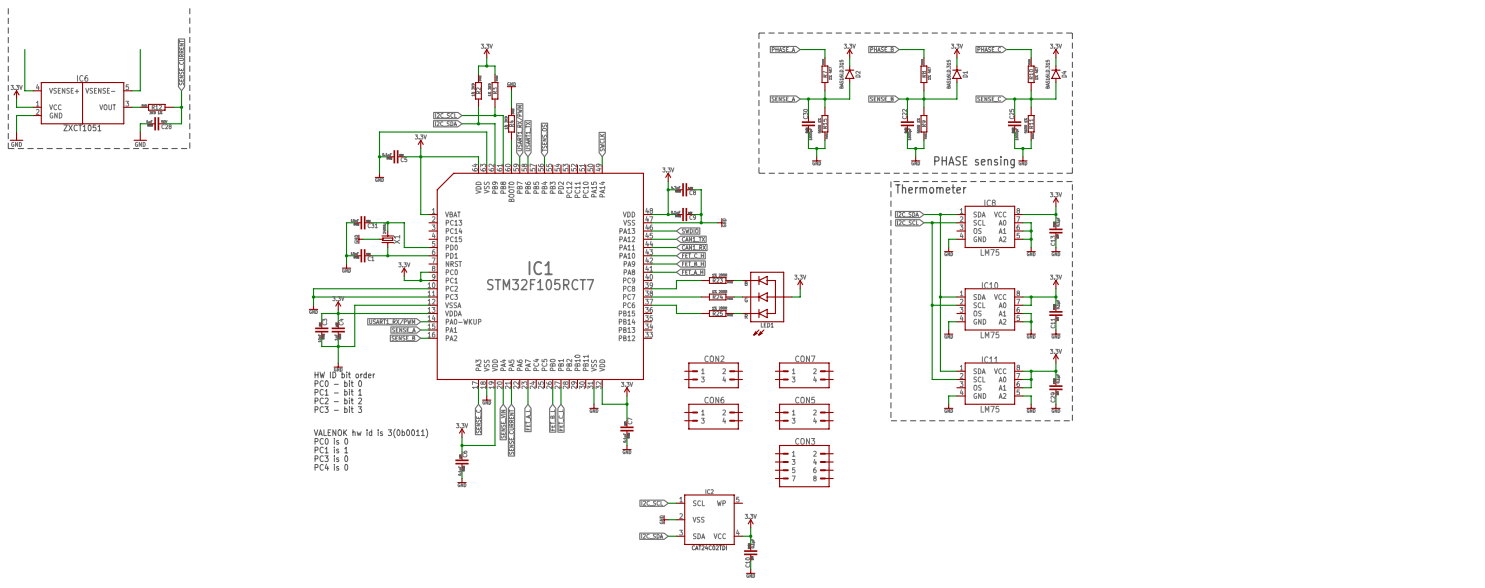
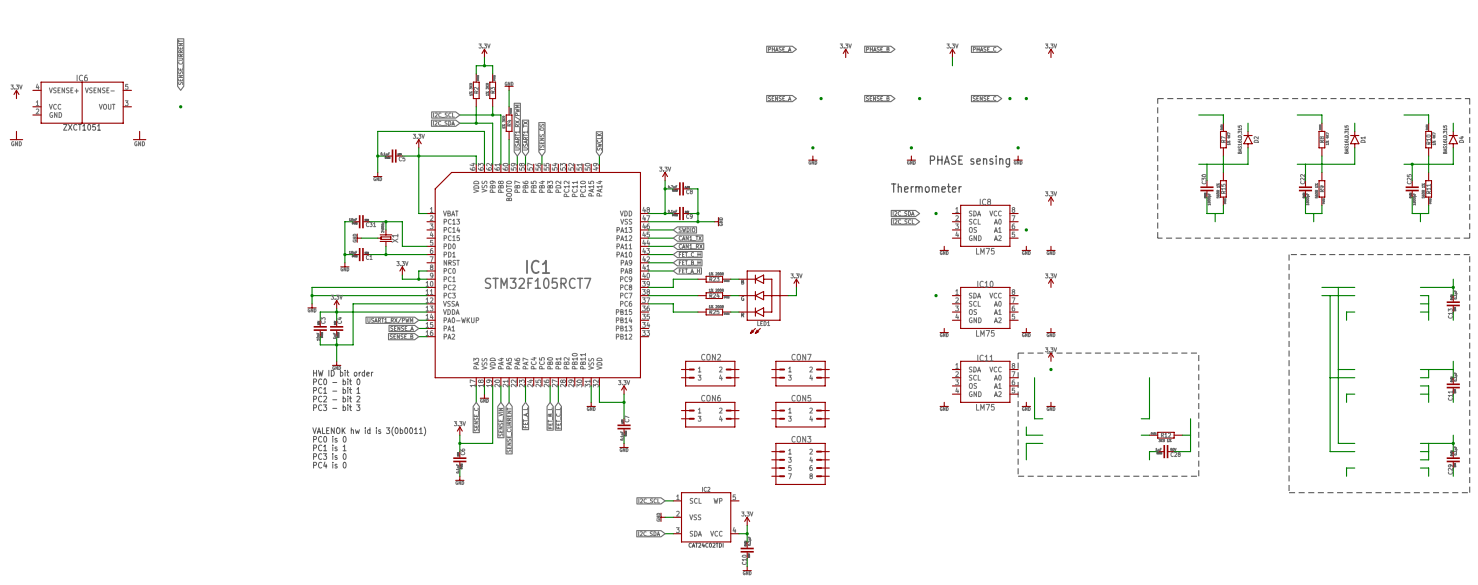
line: (8, 8) (8, 148) (189, 148) (189, 8) -> none
line: (758, 33) (1072, 33) (1072, 173) (758, 173) (758, 33) -> none
wire: (24, 49) (24, 90) (33, 90) -> none
wire: (140, 49) (140, 90) (132, 90) -> none
wire: (800, 49) (824, 49) (824, 57) -> none
wire: (899, 49) (923, 49) (923, 57) -> none
wire: (1006, 49) (1031, 49) (1031, 57) -> none
wire: (849, 57) (849, 66) -> none
wire: (1055, 57) (1055, 66) -> none
part position: (824, 74) -> (1223, 139)
part position: (849, 74) -> (1248, 139)
part position: (923, 74) -> (1321, 139)
part position: (956, 74) -> (1354, 139)
part position: (1031, 74) -> (1428, 139)
part position: (1055, 74) -> (1453, 139)
wire: (849, 82) (849, 99) (800, 99) -> none
wire: (956, 82) (956, 99) (899, 99) -> none
wire: (1055, 82) (1055, 99) (1006, 99) -> none
wire: (181, 90) (181, 123) (165, 123) -> none
wire: (824, 90) (824, 107) -> none
wire: (923, 90) (923, 107) -> none
wire: (1031, 90) (1031, 107) -> none
wire: (16, 99) (16, 107) (33, 107) -> none
wire: (808, 99) (808, 115) -> none
junction: (808, 99) -> none
wire: (907, 99) (907, 115) -> none
junction: (907, 99) -> none
wire: (1014, 99) (1014, 115) -> none
line: none -> (1157, 98) (1469, 98) (1469, 238) (1157, 238) (1157, 98)
wire: (132, 107) (140, 107) -> none
part position: (156, 107) -> (1165, 435)
wire: (173, 107) (181, 107) -> none
wire: (33, 115) (16, 115) (16, 132) -> none
wire: none -> (1198, 114) (1223, 114) (1223, 123)
wire: none -> (1297, 114) (1321, 114) (1321, 123)
wire: none -> (1404, 114) (1428, 114) (1428, 123)
wire: (148, 123) (140, 123) (140, 132) -> none
part position: (156, 123) -> (1165, 451)
part position: (808, 123) -> (1206, 188)
part position: (824, 123) -> (1223, 188)
part position: (907, 123) -> (1305, 188)
part position: (923, 123) -> (1321, 188)
part position: (1014, 123) -> (1412, 188)
part position: (1031, 123) -> (1428, 188)
wire: none -> (1248, 123) (1248, 131)
wire: none -> (1354, 123) (1354, 131)
wire: none -> (1453, 123) (1453, 131)
wire: (808, 132) (808, 148) (824, 148) (824, 140) -> none
wire: (907, 132) (907, 148) (923, 148) (923, 140) -> none
wire: (1014, 132) (1014, 148) (1031, 148) (1031, 140) -> none
wire: (816, 148) (816, 156) -> none
wire: (915, 148) (915, 156) -> none
wire: (1022, 148) (1022, 156) -> none
wire: none -> (1248, 147) (1248, 164) (1198, 164)
wire: none -> (1354, 147) (1354, 164) (1297, 164)
wire: none -> (1453, 147) (1453, 164) (1404, 164)
wire: none -> (1223, 156) (1223, 172)
wire: none -> (1321, 156) (1321, 172)
wire: none -> (1428, 156) (1428, 172)
wire: none -> (1206, 164) (1206, 180)
wire: none -> (1305, 164) (1305, 180)
wire: none -> (1412, 164) (1412, 180)
junction: none -> (1412, 164)
line: (890, 181) (890, 420) (1072, 420) (1072, 181) (890, 181) -> none
wire: none -> (1206, 197) (1206, 213) (1223, 213) (1223, 205)
wire: none -> (1305, 197) (1305, 213) (1321, 213) (1321, 205)
wire: none -> (1412, 197) (1412, 213) (1428, 213) (1428, 205)
wire: (1055, 206) (1055, 222) -> none
wire: (923, 214) (956, 214) -> none
wire: (940, 214) (940, 371) (956, 371) -> none
wire: (1022, 214) (1055, 214) -> none
junction: (1055, 214) -> none
wire: none -> (1215, 213) (1215, 221)
wire: none -> (1313, 213) (1313, 221)
wire: none -> (1420, 213) (1420, 221)
wire: (923, 222) (956, 222) -> none
wire: (932, 222) (932, 379) (956, 379) -> none
junction: (932, 222) -> none
wire: (1022, 222) (1031, 222) (1031, 247) -> none
wire: (1022, 231) (1031, 231) -> none
part position: (1055, 231) -> (1453, 303)
wire: (956, 239) (948, 239) (948, 247) -> none
wire: (1022, 239) (1031, 239) -> none
junction: (1031, 239) -> none
wire: (1055, 239) (1055, 247) -> none
line: none -> (1289, 254) (1289, 492) (1469, 492) (1469, 254) (1289, 254)
wire: none -> (1453, 279) (1453, 295)
wire: (1055, 288) (1055, 305) -> none
wire: none -> (1321, 287) (1354, 287)
wire: none -> (1338, 287) (1338, 443) (1354, 443)
wire: none -> (1420, 287) (1453, 287)
junction: none -> (1453, 287)
wire: (940, 297) (956, 297) -> none
wire: (1022, 297) (1055, 297) -> none
wire: (1031, 297) (1031, 305) (1022, 305) -> none
junction: (1031, 297) -> none
junction: (1055, 297) -> none
wire: none -> (1321, 295) (1354, 295)
wire: none -> (1330, 295) (1330, 451) (1354, 451)
wire: none -> (1420, 295) (1428, 295) (1428, 320)
wire: (932, 305) (956, 305) -> none
junction: (932, 305) -> none
wire: none -> (1420, 303) (1428, 303)
wire: (1022, 313) (1031, 313) (1031, 330) -> none
part position: (1055, 313) -> (1453, 385)
wire: none -> (1354, 312) (1346, 312) (1346, 320)
wire: none -> (1420, 312) (1428, 312)
wire: none -> (1453, 312) (1453, 320)
wire: (956, 321) (948, 321) (948, 330) -> none
wire: (1022, 321) (1031, 321) -> none
junction: (1031, 321) -> none
wire: (1055, 321) (1055, 330) -> none
line: none -> (1018, 353) (1018, 476) (1198, 476) (1198, 353) (1018, 353)
wire: (1055, 363) (1055, 379) -> none
wire: none -> (1453, 361) (1453, 377)
wire: (1022, 371) (1055, 371) -> none
wire: (1031, 371) (1031, 387) (1022, 387) -> none
junction: (1031, 371) -> none
wire: none -> (1338, 369) (1354, 369)
wire: none -> (1420, 369) (1453, 369)
wire: none -> (1428, 369) (1428, 377) (1420, 377)
wire: (1022, 379) (1031, 379) -> none
junction: (1031, 379) -> none
wire: none -> (1034, 377) (1034, 418) (1042, 418)
wire: none -> (1149, 377) (1149, 418) (1141, 418)
wire: none -> (1330, 377) (1354, 377)
part position: (1055, 387) -> (1453, 459)
wire: none -> (1420, 385) (1428, 385) (1428, 402)
wire: (956, 396) (948, 396) (948, 404) -> none
wire: (1022, 396) (1031, 396) (1031, 404) -> none
wire: (1055, 396) (1055, 404) -> none
wire: none -> (1354, 394) (1346, 394) (1346, 402)
wire: none -> (1420, 394) (1428, 394)
wire: none -> (1453, 394) (1453, 402)
wire: none -> (1190, 418) (1190, 451) (1174, 451)
wire: none -> (1026, 426) (1026, 435) (1042, 435)
wire: none -> (1141, 435) (1149, 435)
wire: none -> (1182, 435) (1190, 435)
wire: none -> (1453, 435) (1453, 451)
wire: none -> (1042, 443) (1026, 443) (1026, 459)
wire: none -> (1420, 443) (1453, 443)
wire: none -> (1428, 443) (1428, 459) (1420, 459)
junction: none -> (1453, 443)
wire: none -> (1157, 451) (1149, 451) (1149, 459)
wire: none -> (1420, 451) (1428, 451)
wire: none -> (1354, 468) (1346, 468) (1346, 476)
wire: none -> (1420, 468) (1428, 468) (1428, 476)
wire: none -> (1453, 468) (1453, 476)

